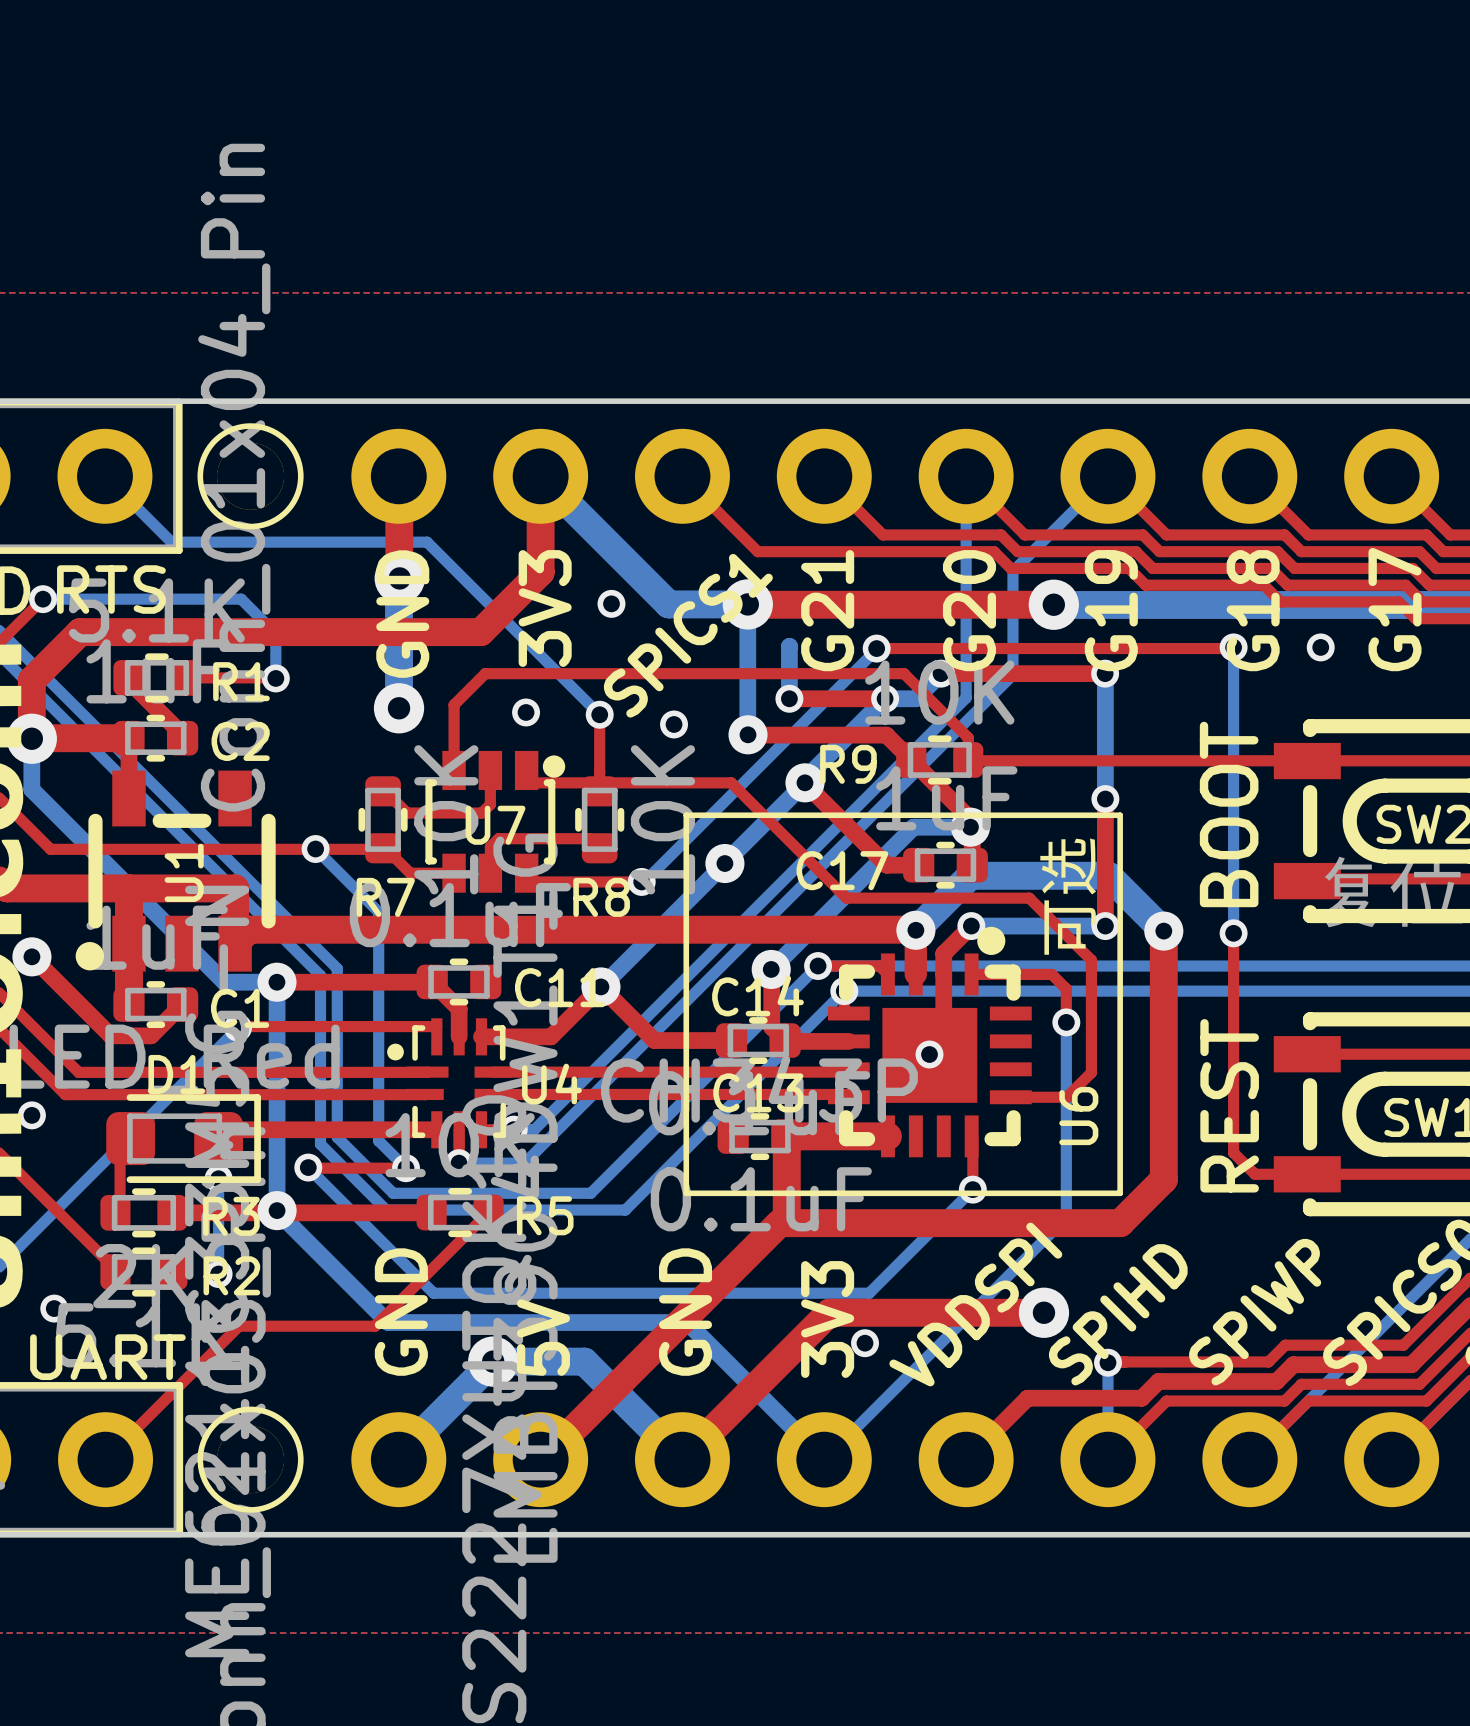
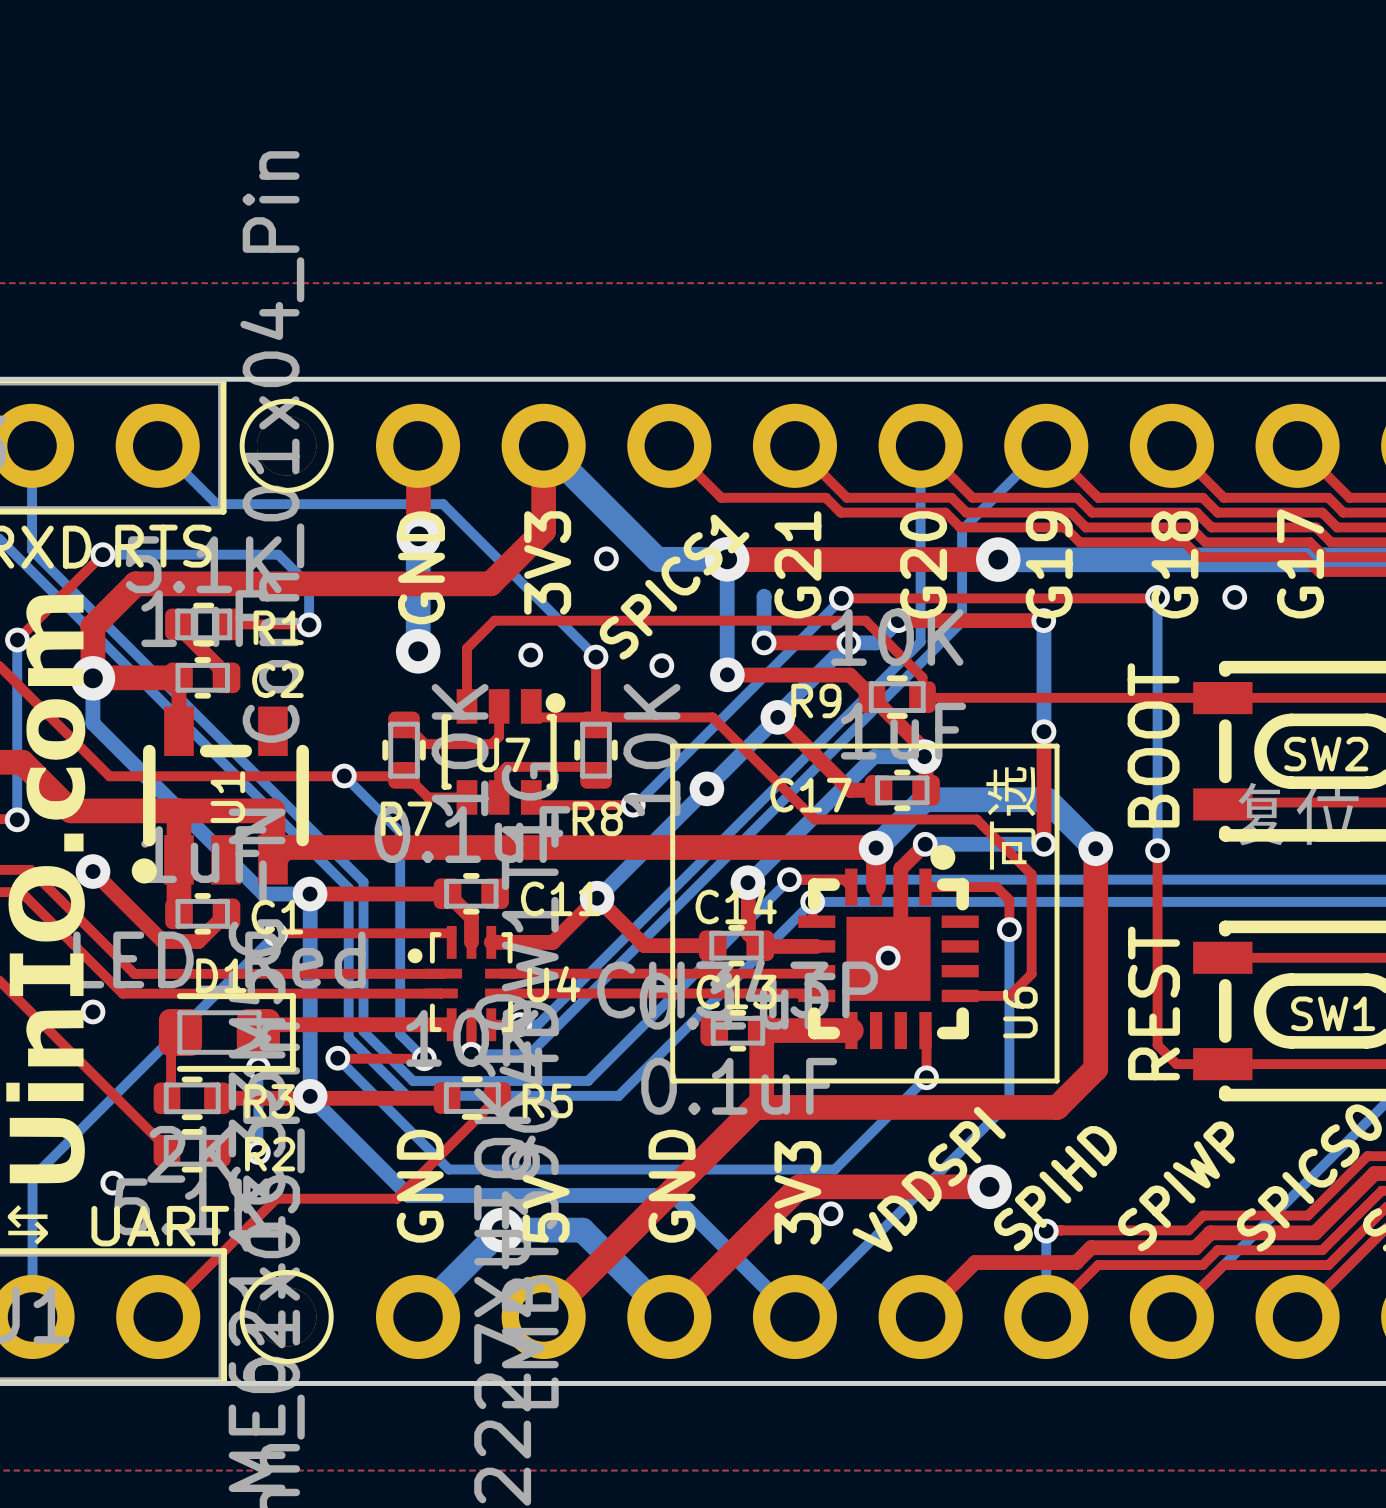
top track: (741, 534) (757, 551) (876, 551) -> (721, 497) (825, 497) (840, 512)

